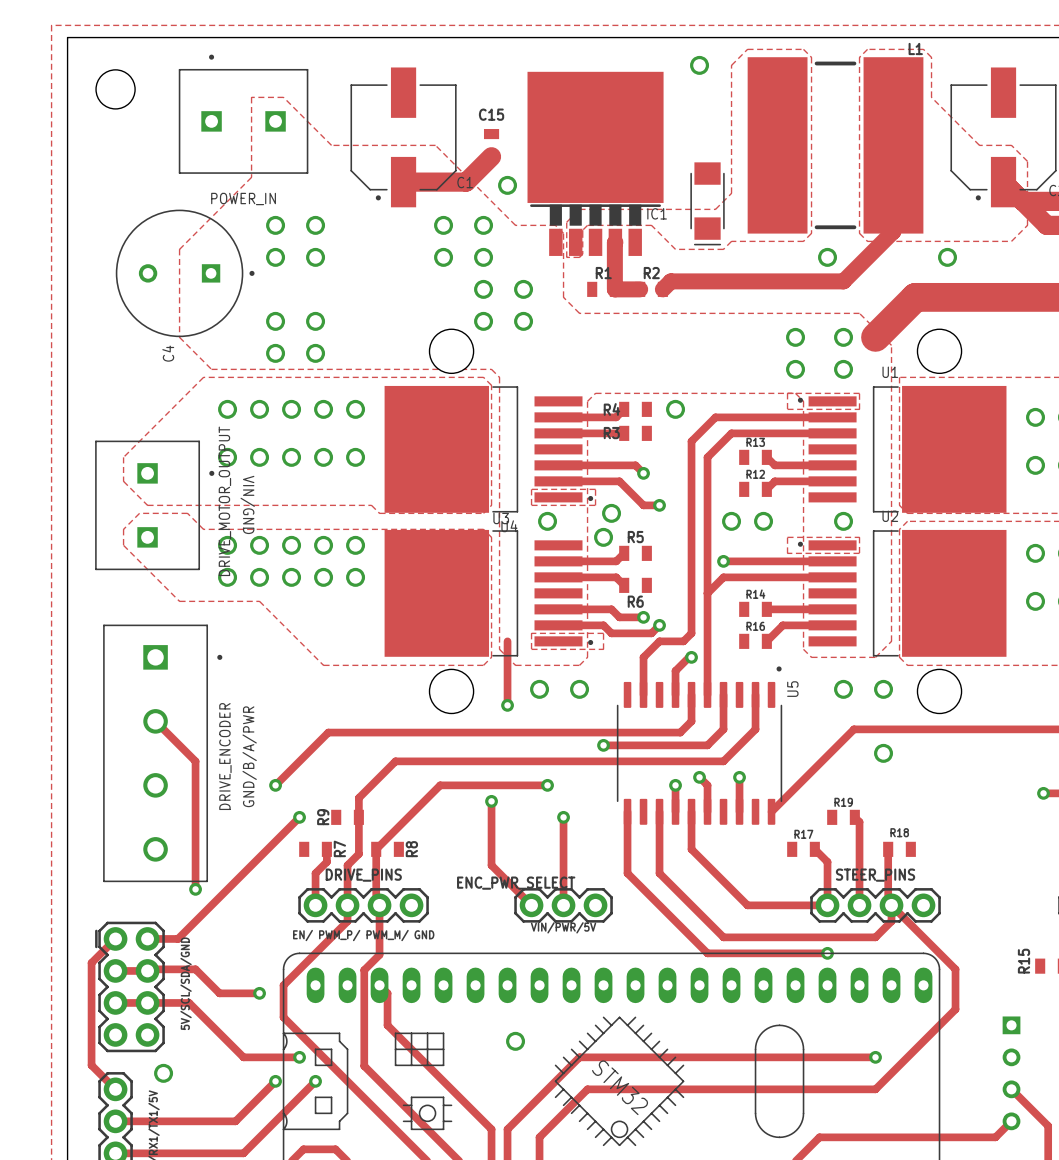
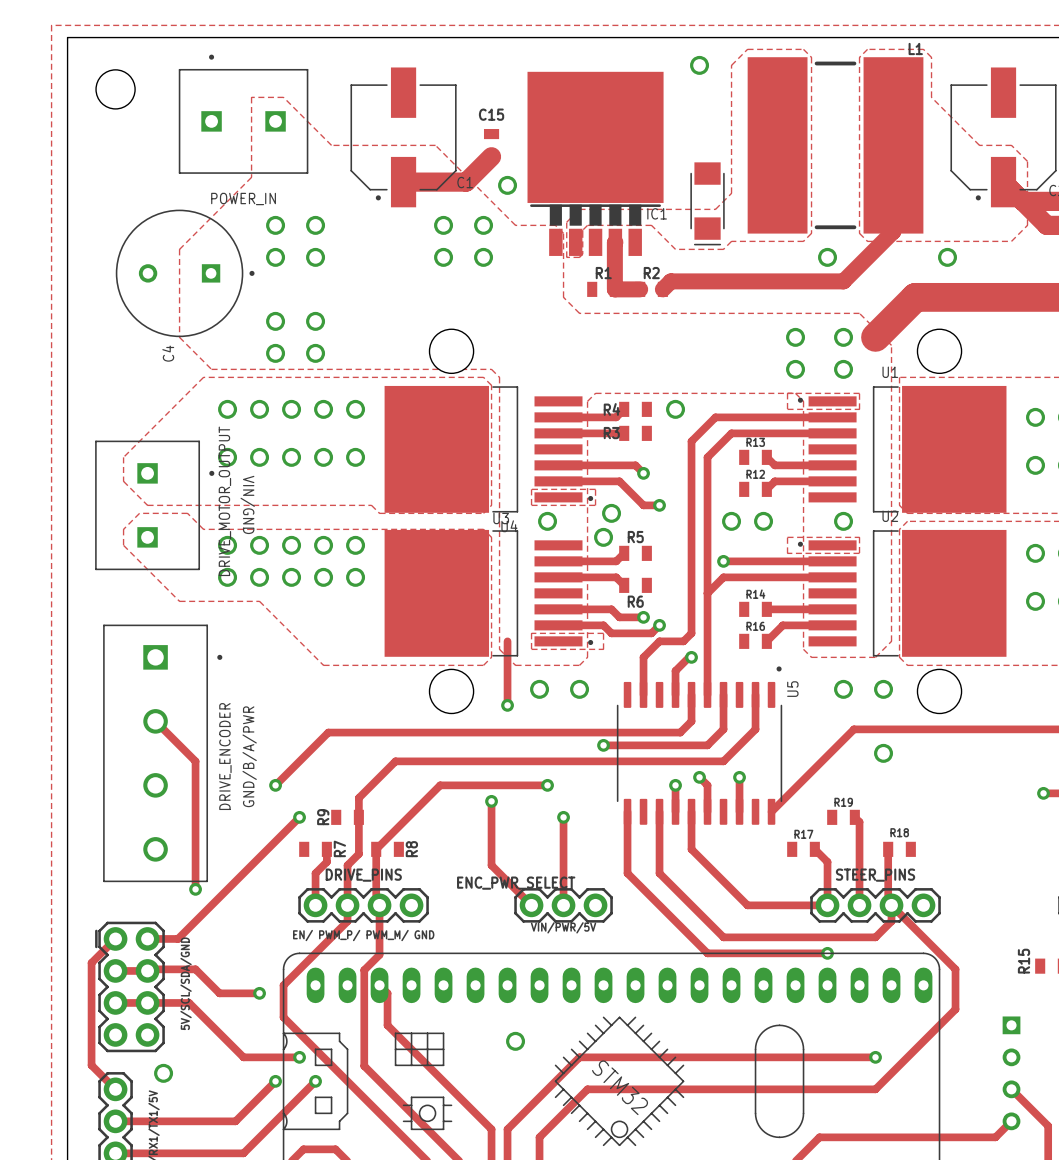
via: (483, 289) -> none
via: (523, 289) -> none
via: (483, 321) -> none
via: (523, 321) -> none

